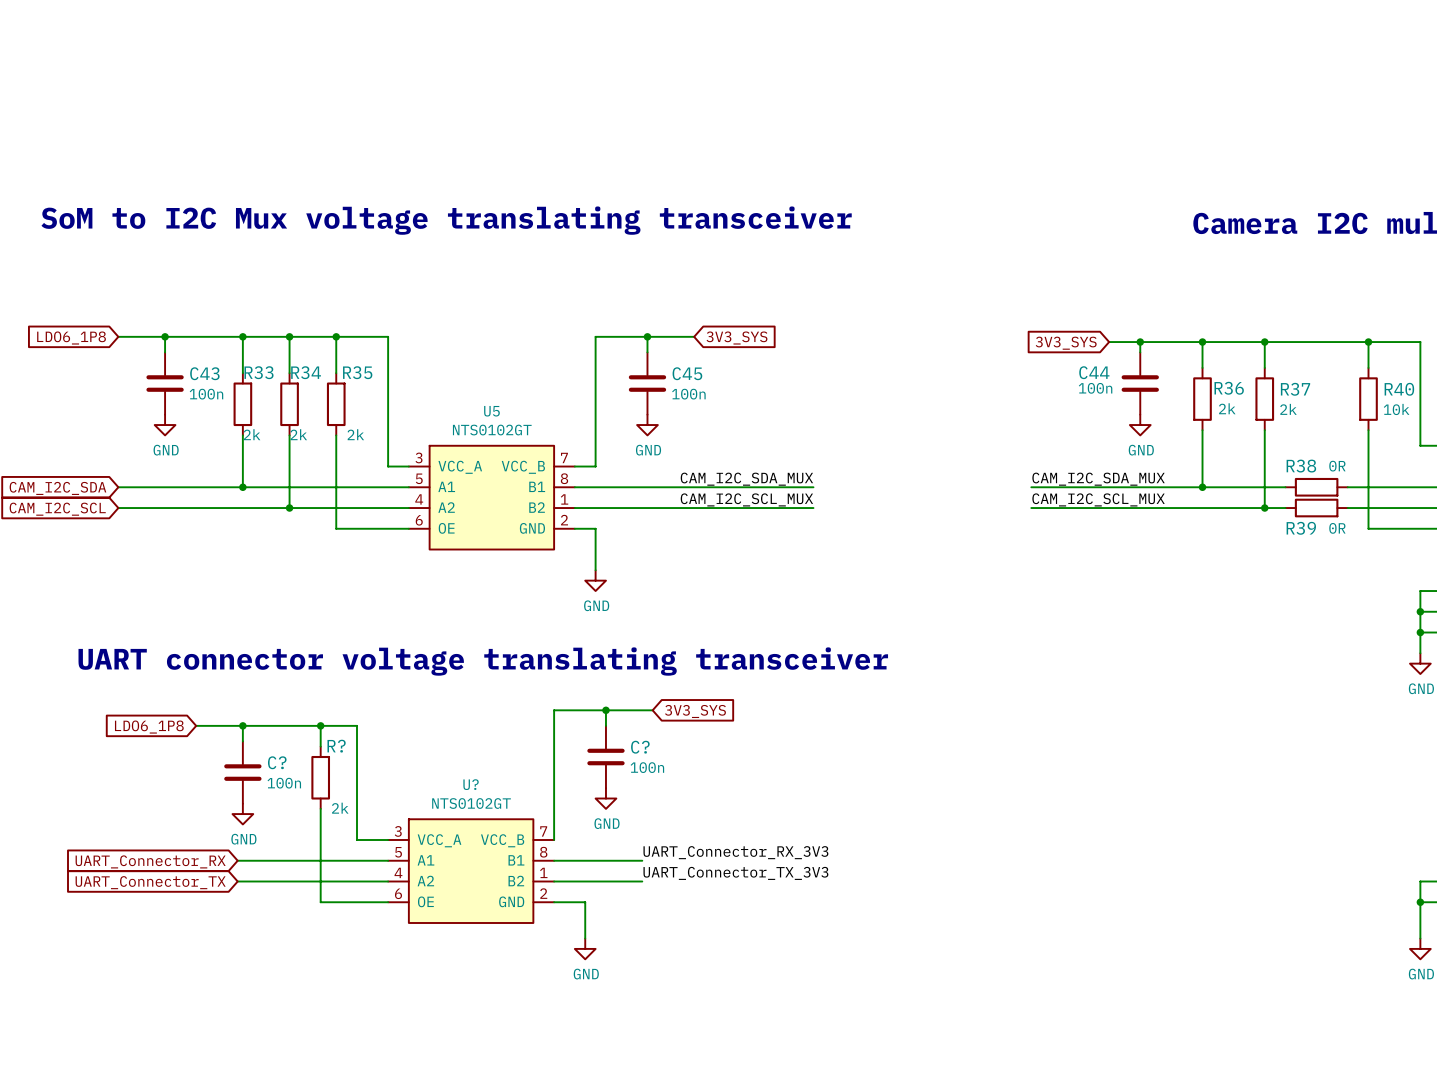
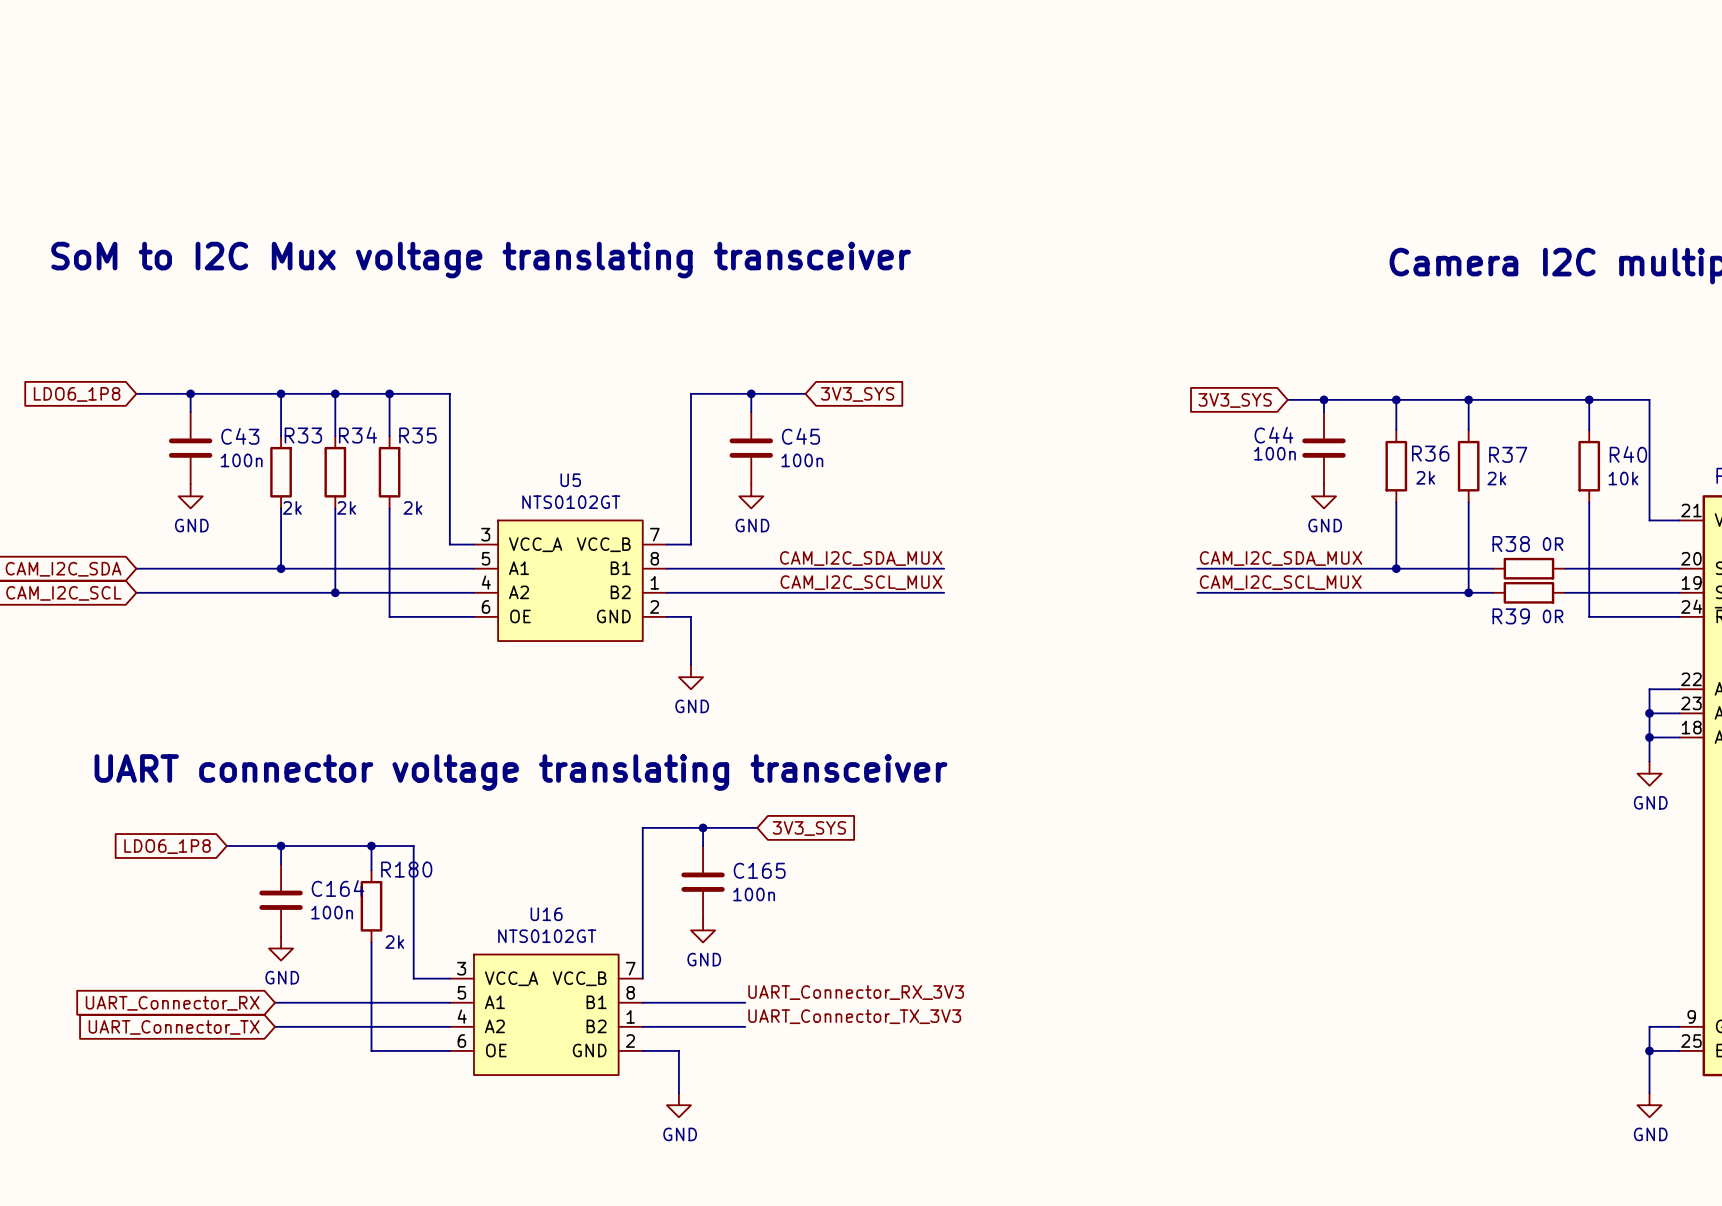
R? name: R? (336, 746) -> R180 (406, 869)
C? name: C? (640, 747) -> C165 (759, 870)
C? name: C? (277, 762) -> C164 (337, 888)
U? name: U? (471, 784) -> U16 (546, 914)

